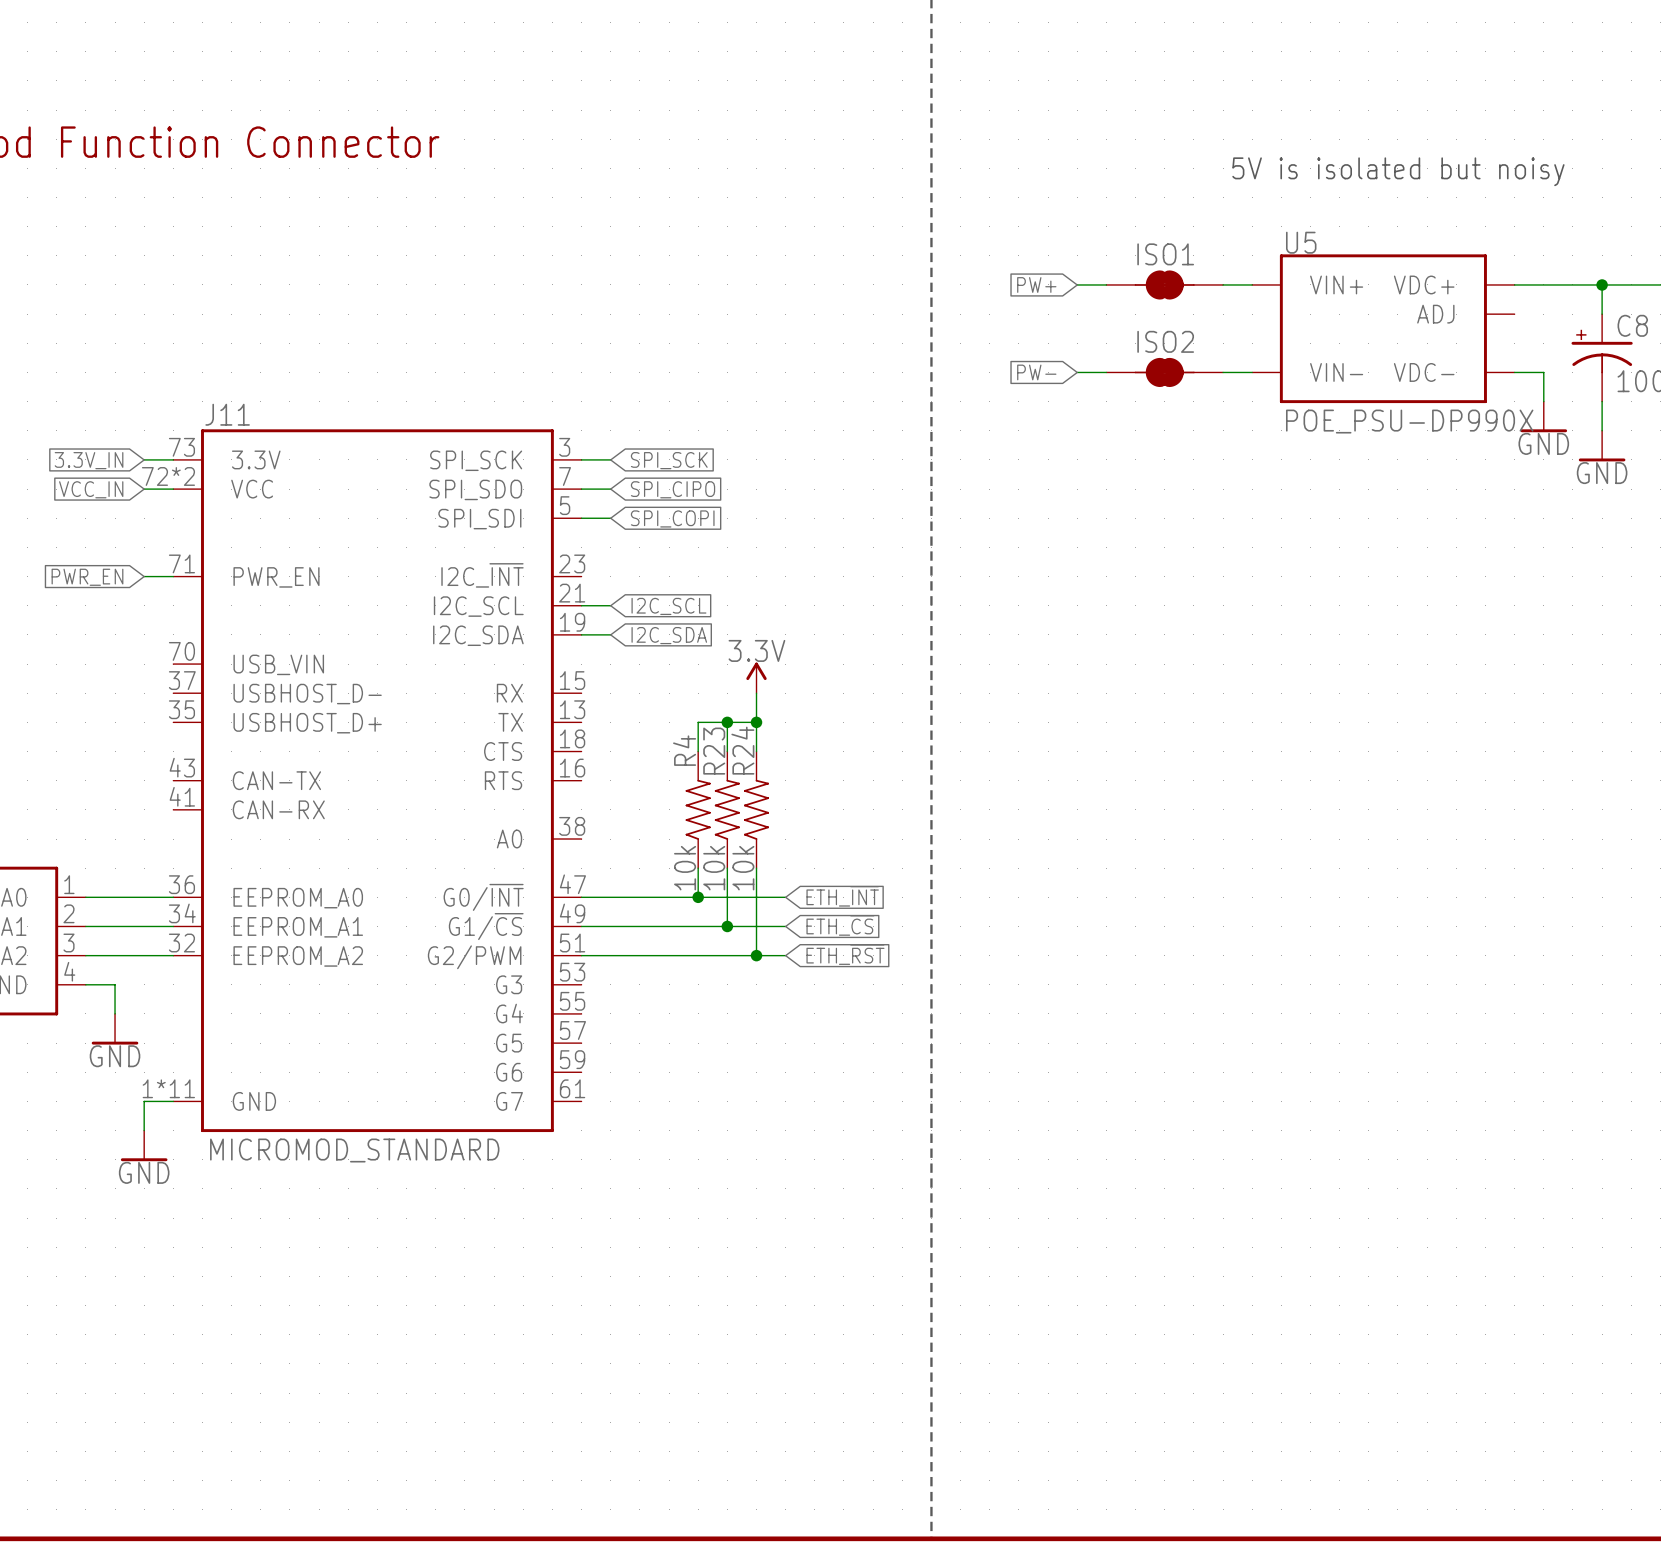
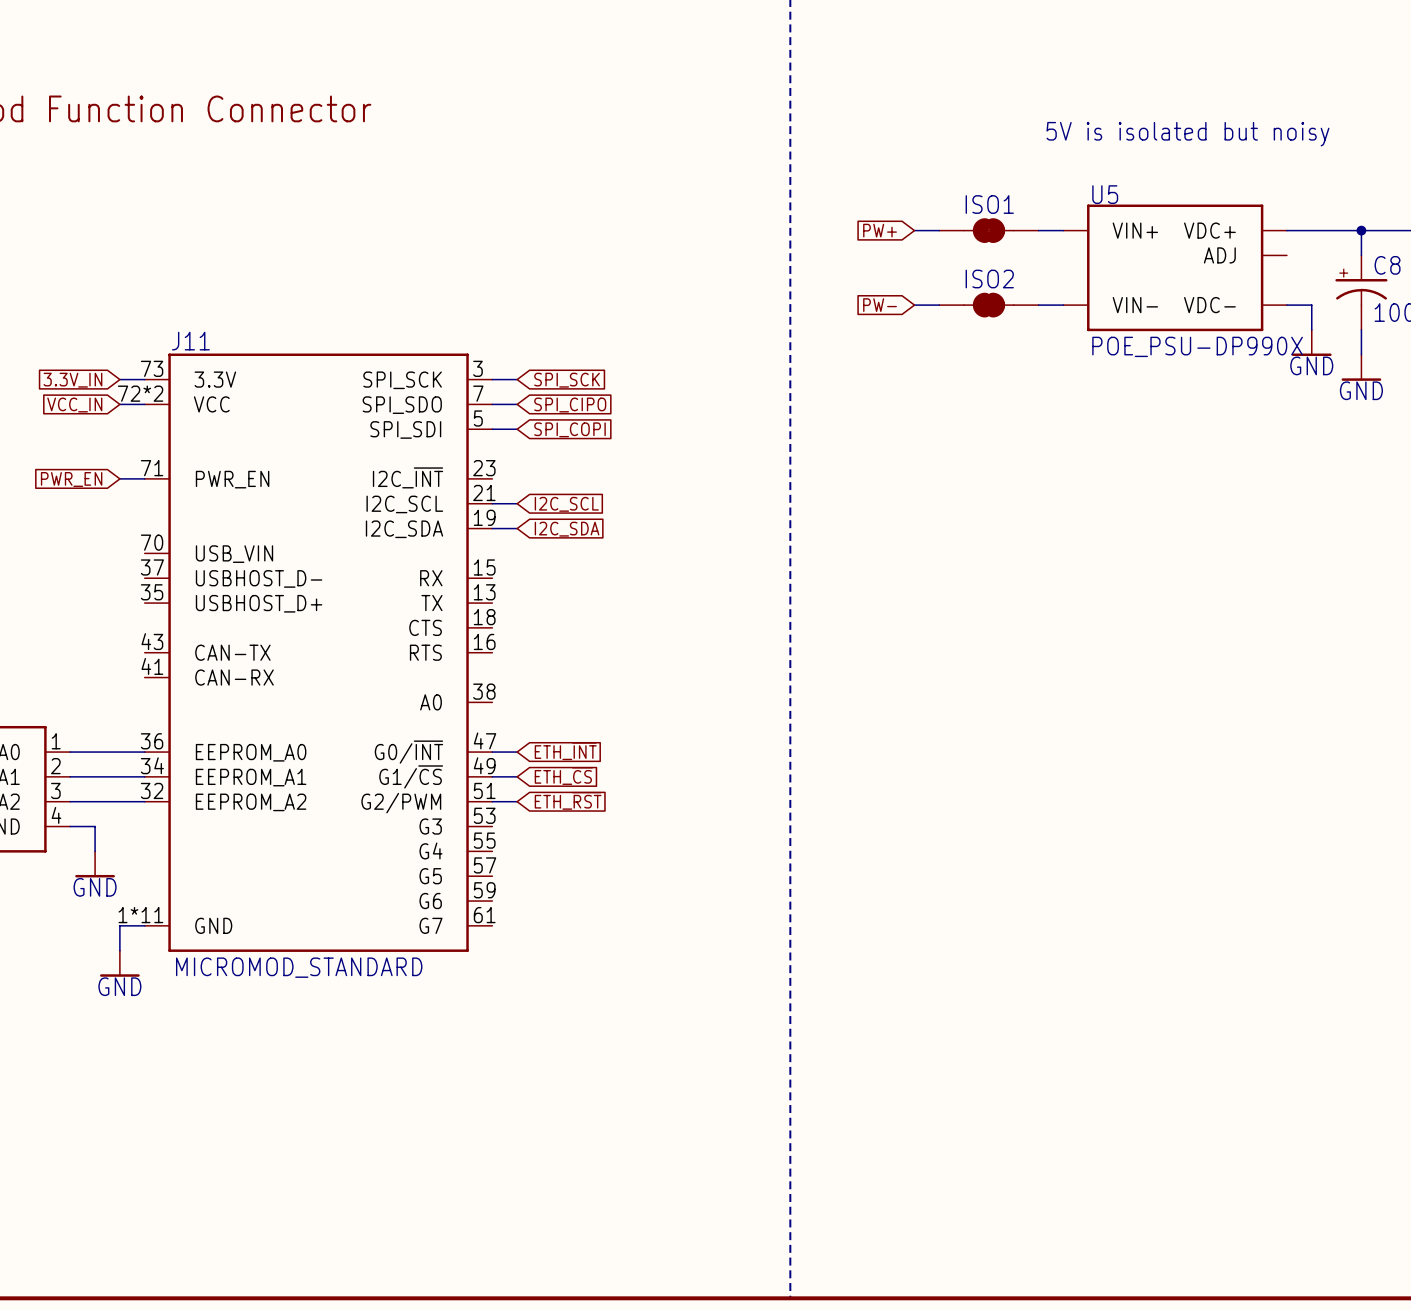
power symbol: 3.3V (756, 677) -> none
wire: (756, 693) (756, 751) -> none
wire: (727, 722) (727, 751) -> none
junction: (727, 722) -> none
wire: (756, 722) (698, 722) (698, 751) -> none
junction: (756, 722) -> none
R4: 10k (698, 809) -> none
R23: 10k (727, 809) -> none
R24: 10k (756, 809) -> none
wire: (698, 868) (698, 897) -> none
wire: (727, 868) (727, 926) -> none
wire: (756, 868) (756, 955) -> none
global label position: ETH_~{INT} (842, 896) -> ETH_~{INT} (565, 751)
wire: (610, 897) (785, 897) -> none
junction: (698, 897) -> none
global label position: ETH_~{CS} (840, 925) -> ETH_~{CS} (563, 776)
wire: (610, 926) (785, 926) -> none
junction: (727, 926) -> none
global label position: ETH_~{RST} (845, 954) -> ETH_~{RST} (568, 800)
wire: (610, 955) (785, 955) -> none
junction: (756, 955) -> none

